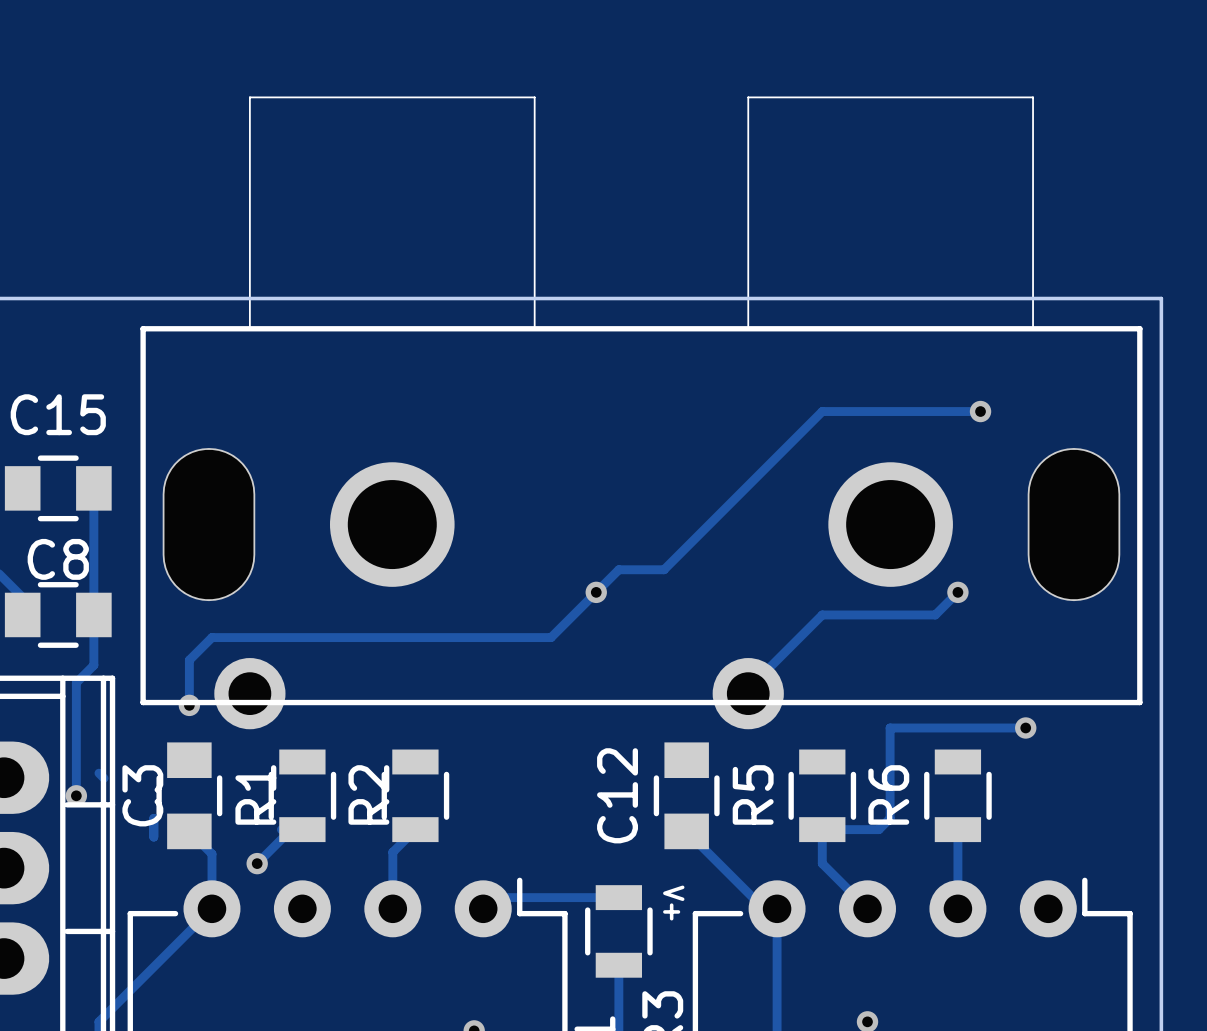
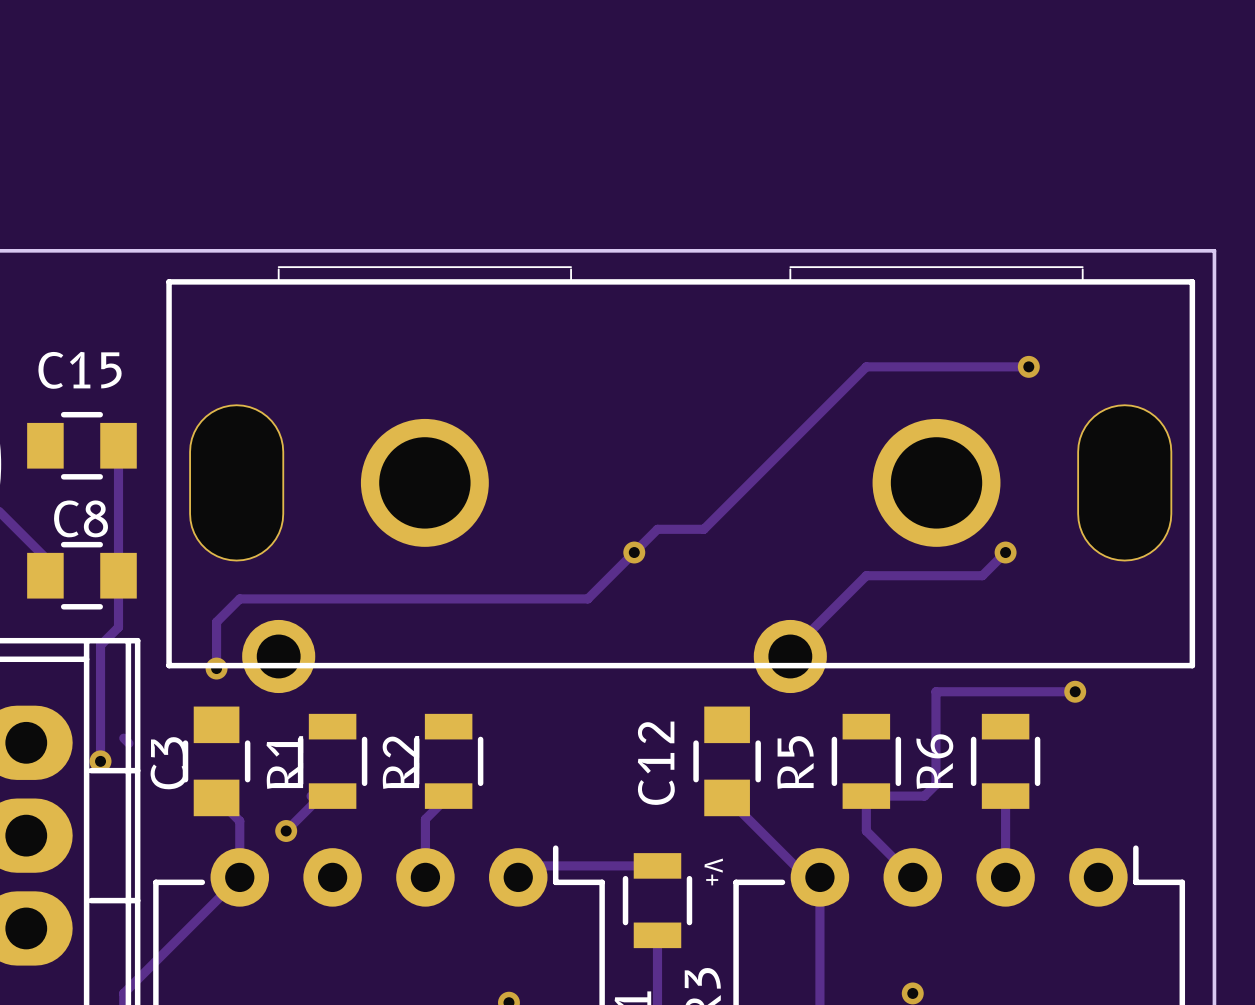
part: (641, 412) -> none
part: none -> (680, 479)
track: (153, 818) (153, 837) -> none

